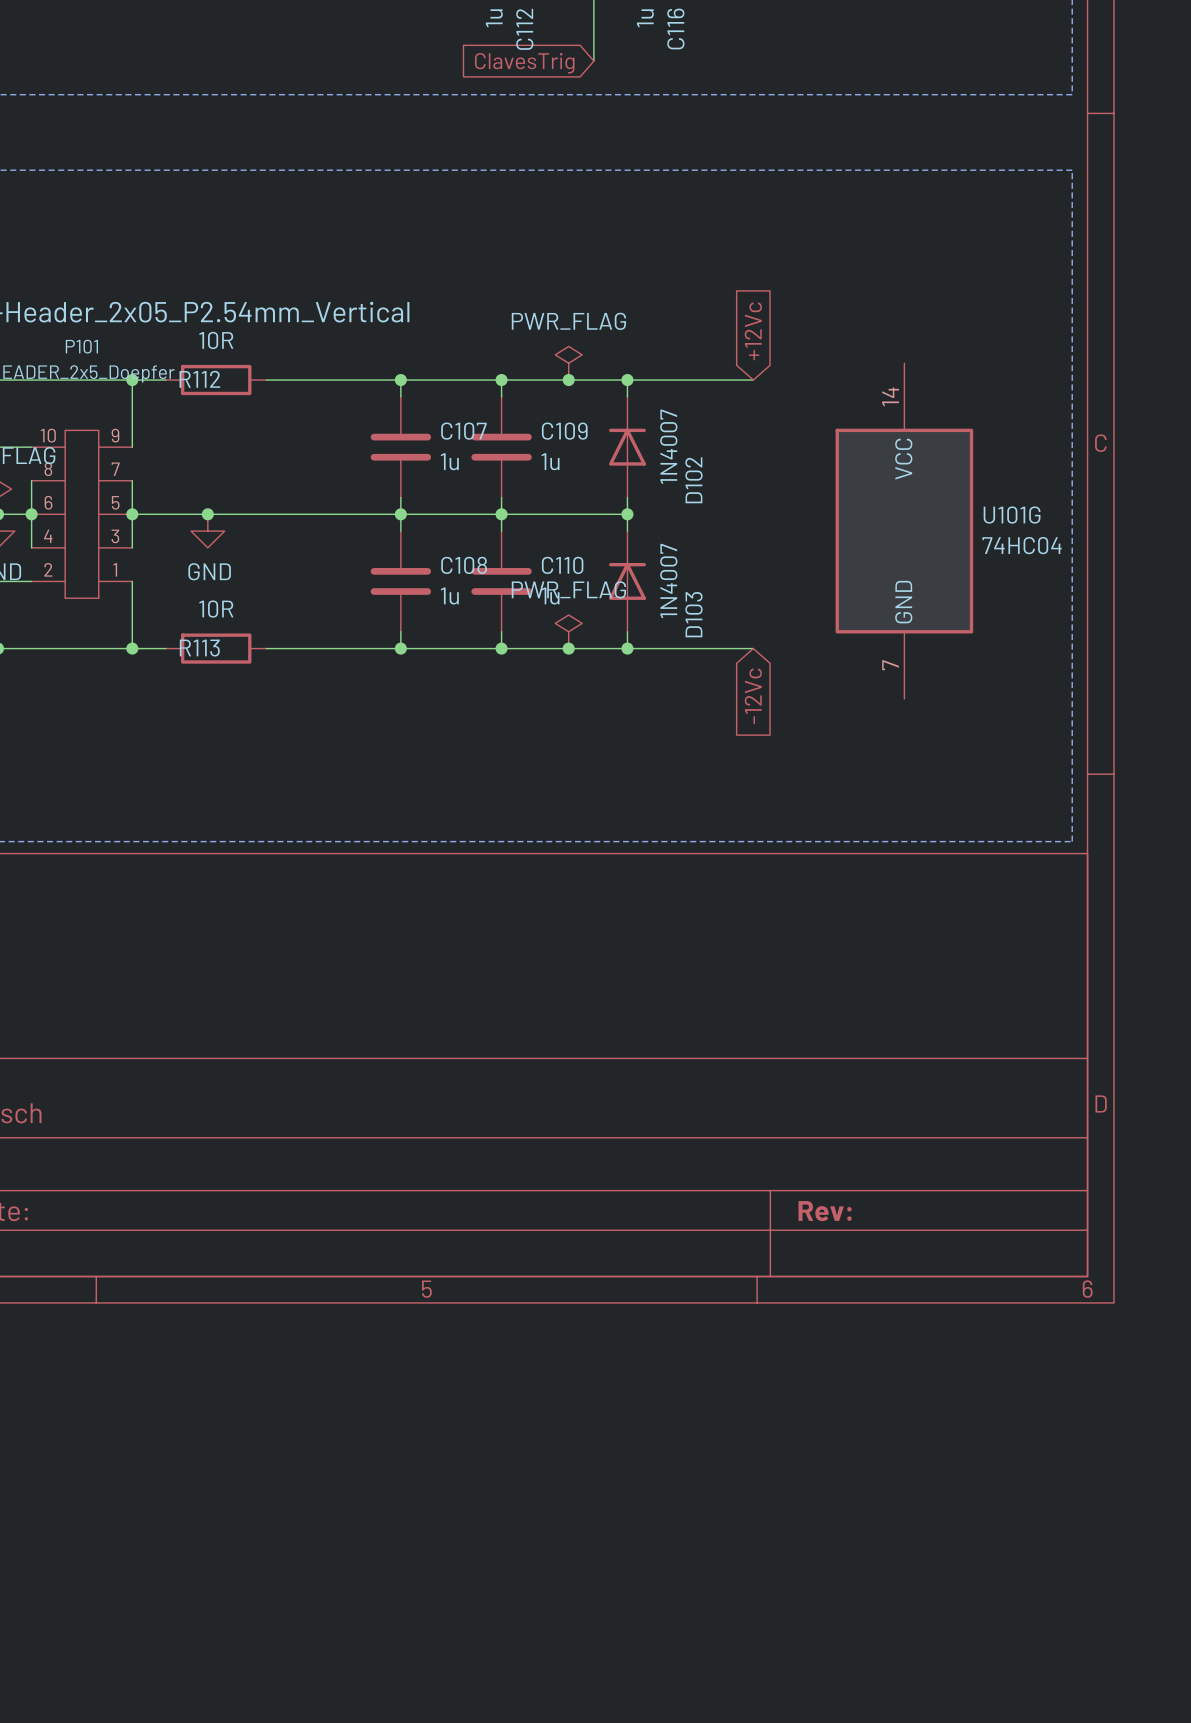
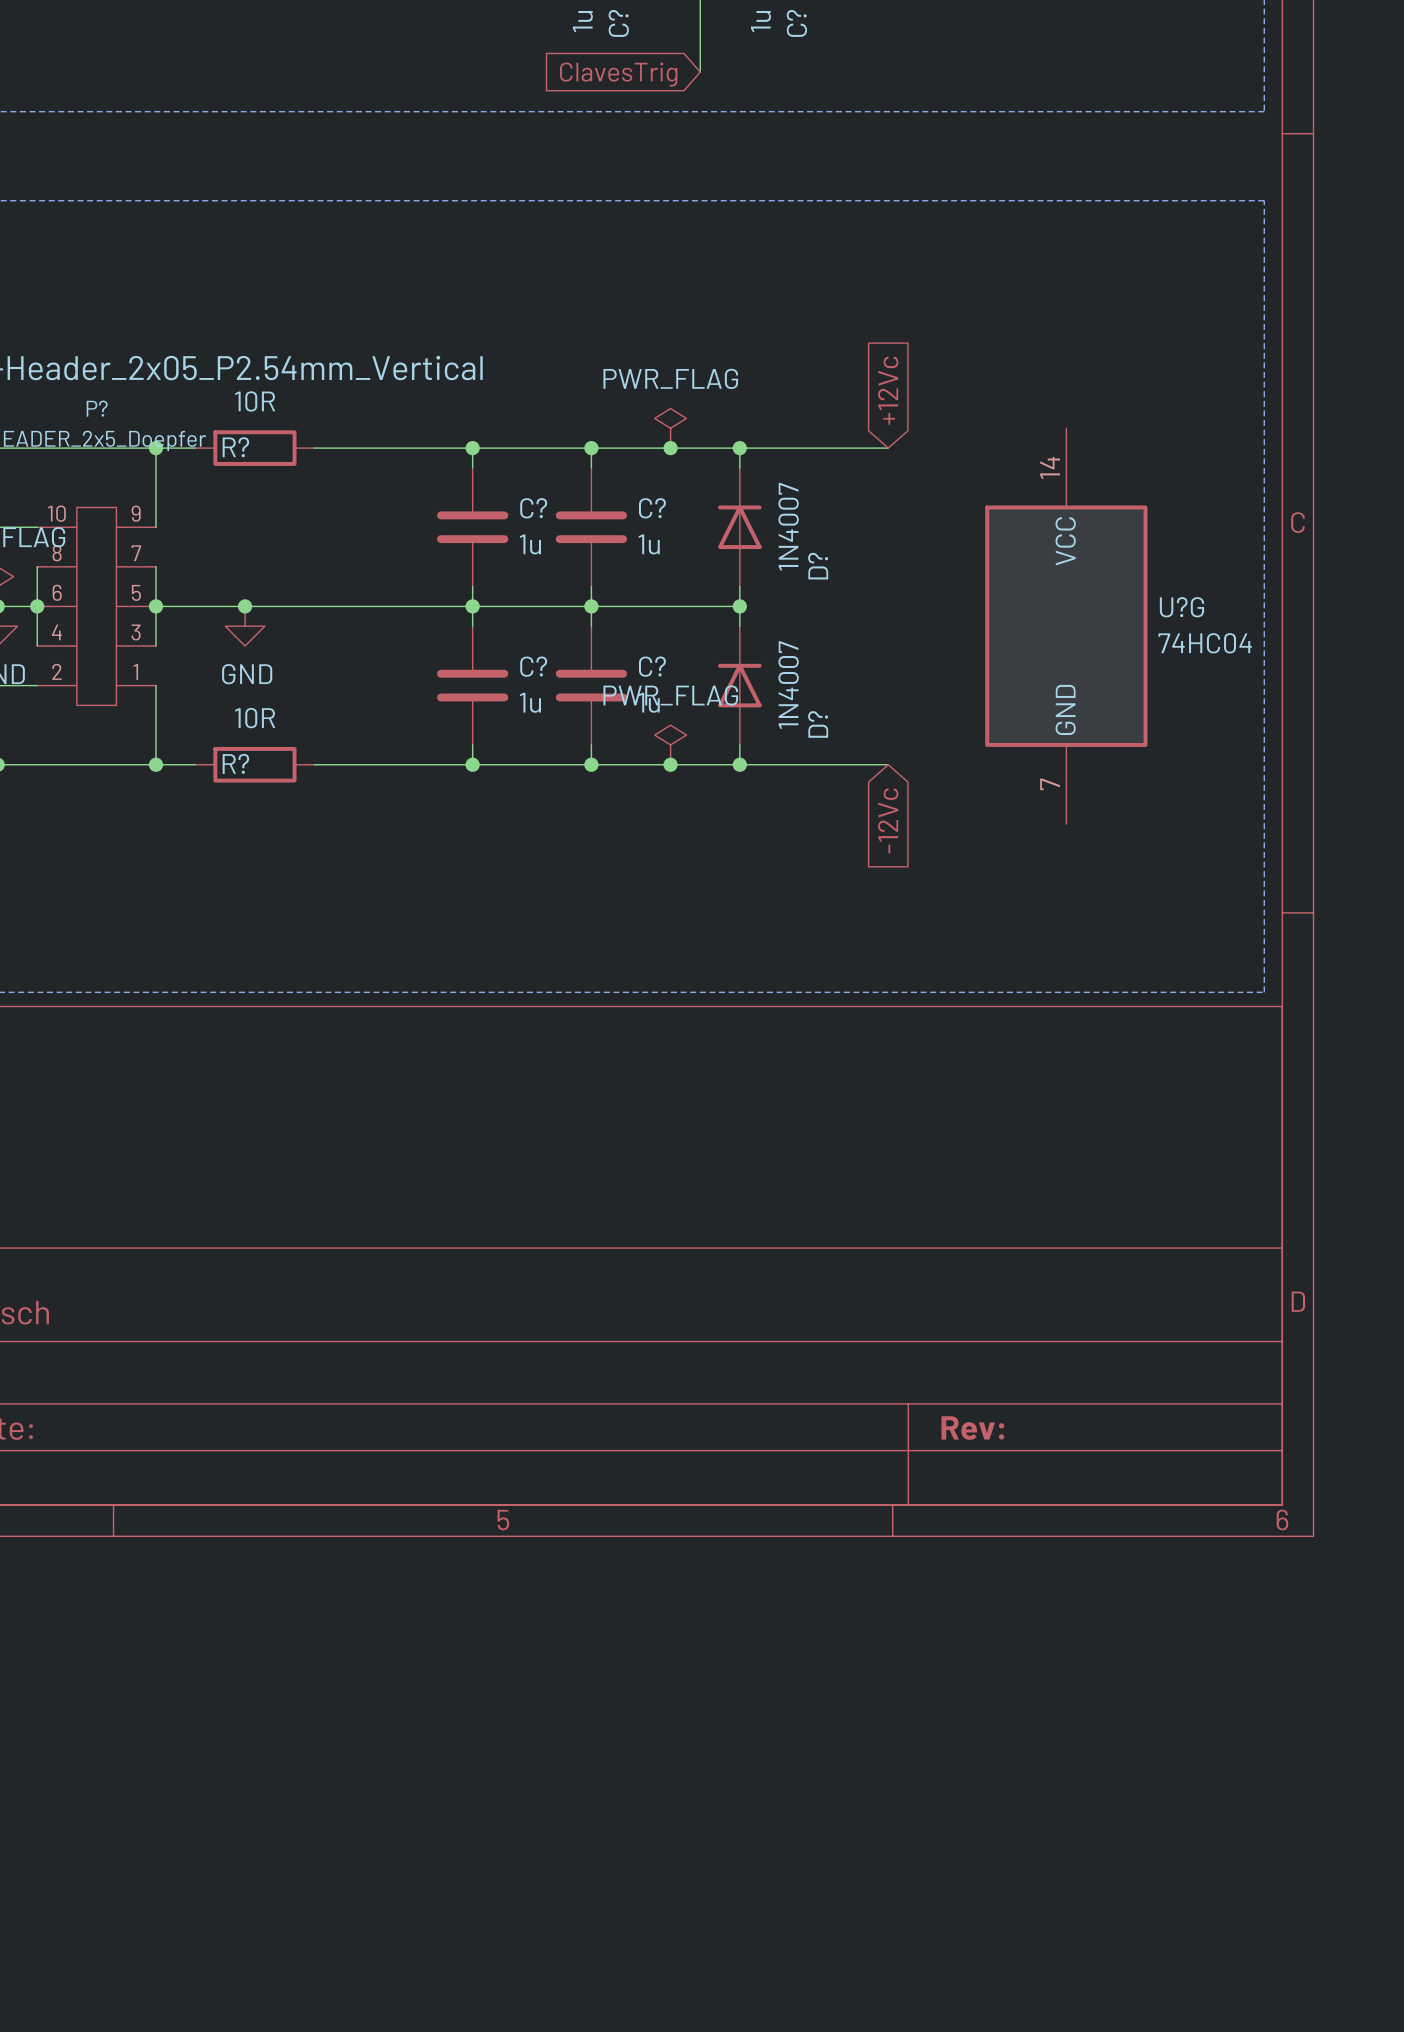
C116 name: C116 (675, 28) -> C? (796, 23)
C112 name: C112 (524, 29) -> C? (618, 23)
P101 name: P101 (81, 346) -> P? (97, 408)
R112 name: R112 (199, 379) -> R? (235, 447)
C107 name: C107 (463, 431) -> C? (533, 508)
C109 name: C109 (564, 431) -> C? (652, 508)
D102 name: D102 (693, 480) -> D? (818, 566)
U101G name: U101G (1012, 515) -> U?G (1181, 607)
C108 name: C108 (464, 565) -> C? (533, 666)
C110 name: C110 (562, 565) -> C? (652, 666)
D103 name: D103 (693, 614) -> D? (818, 724)
R113 name: R113 (199, 648) -> R? (235, 763)

